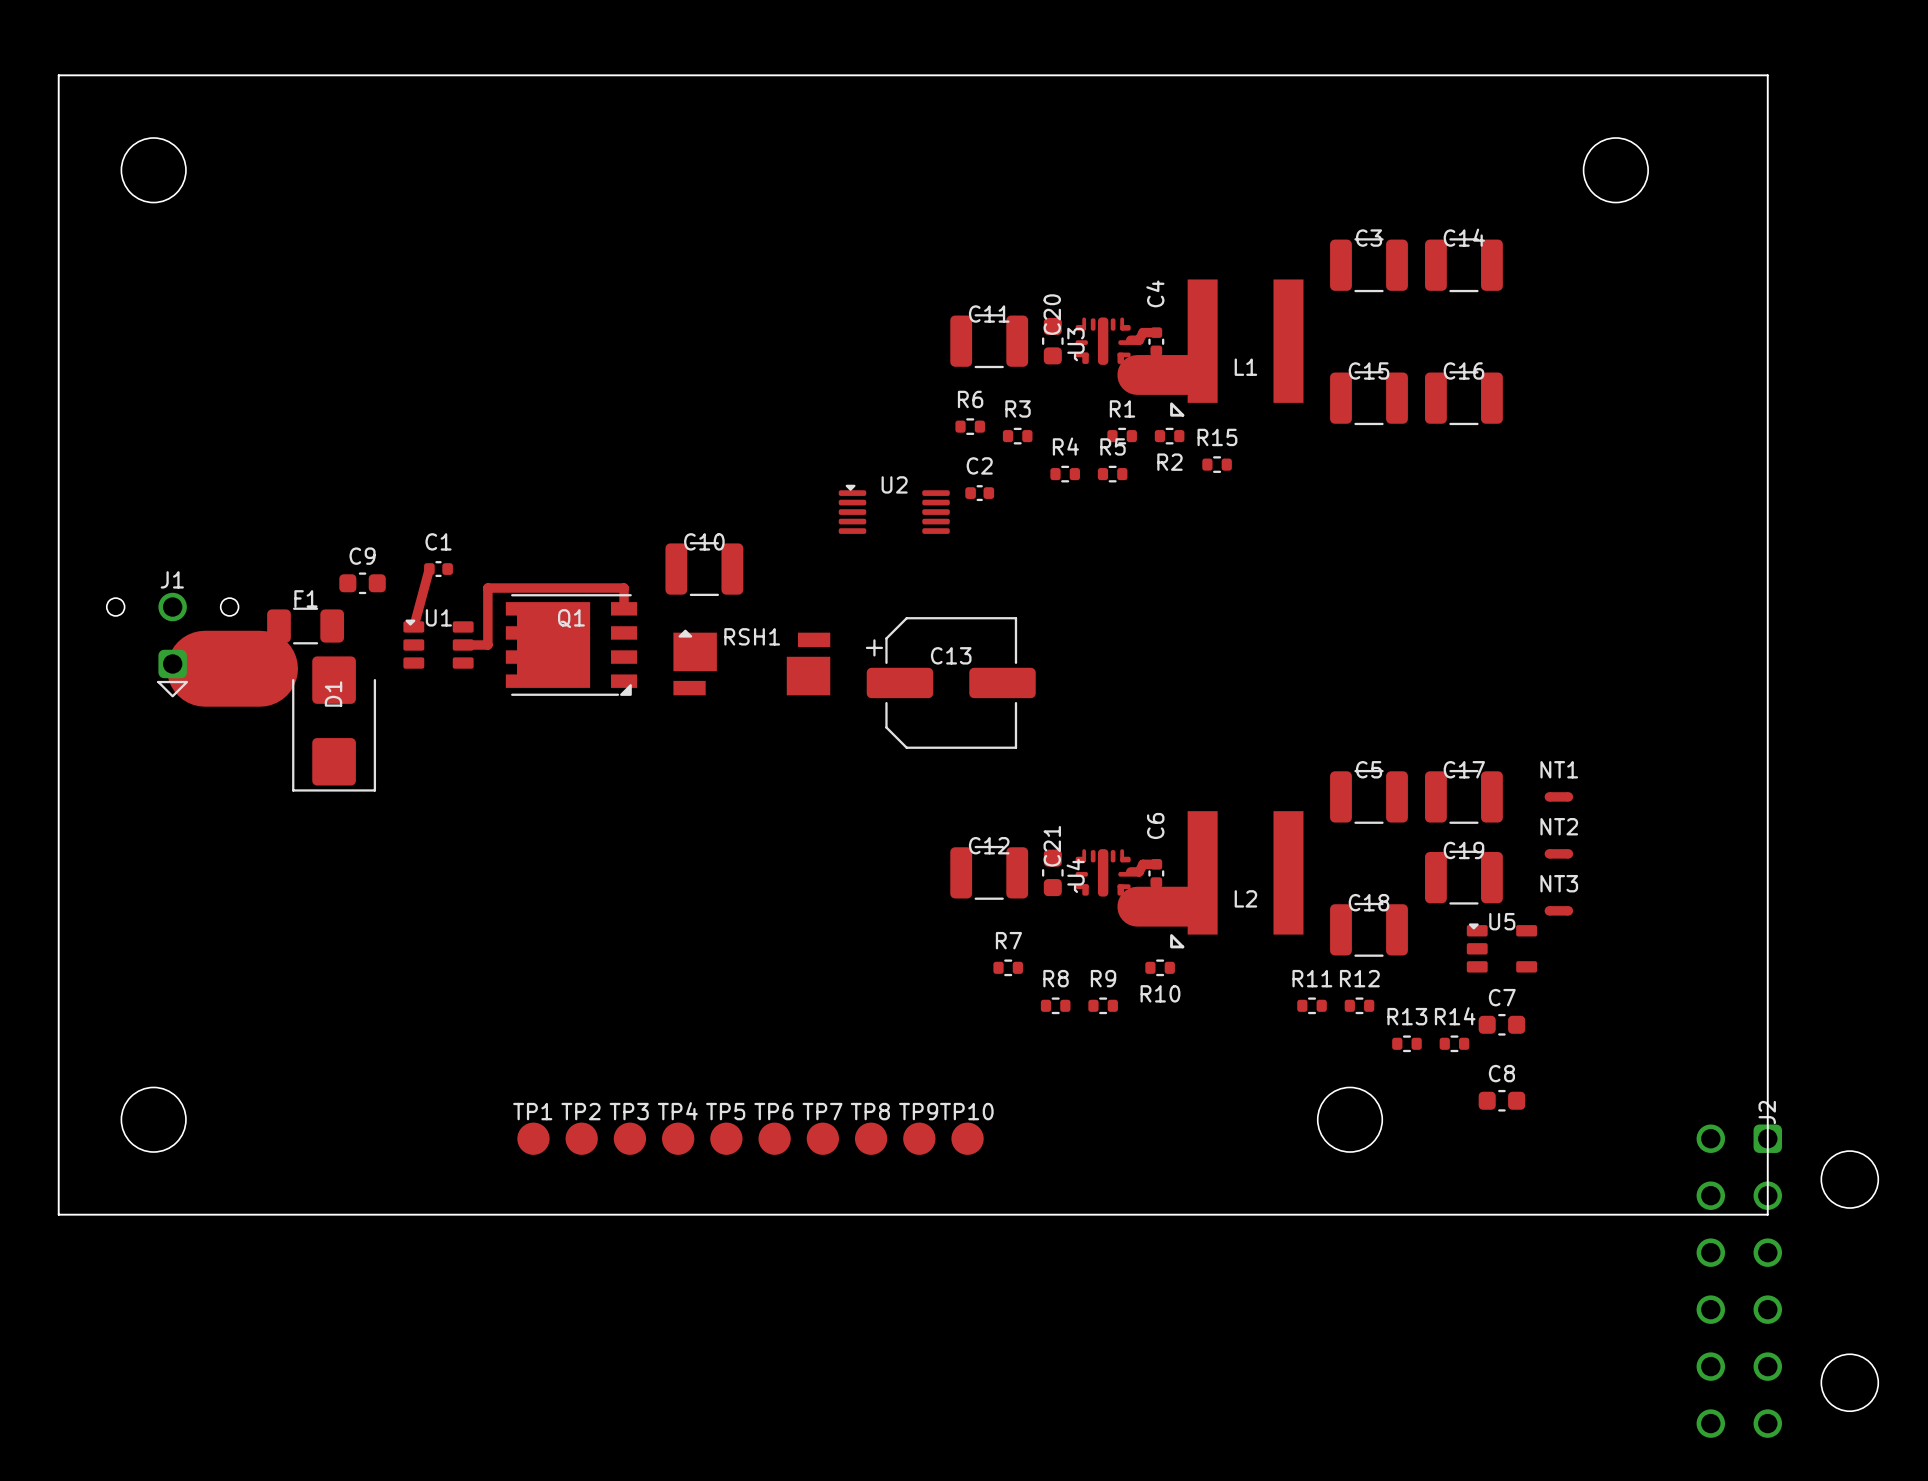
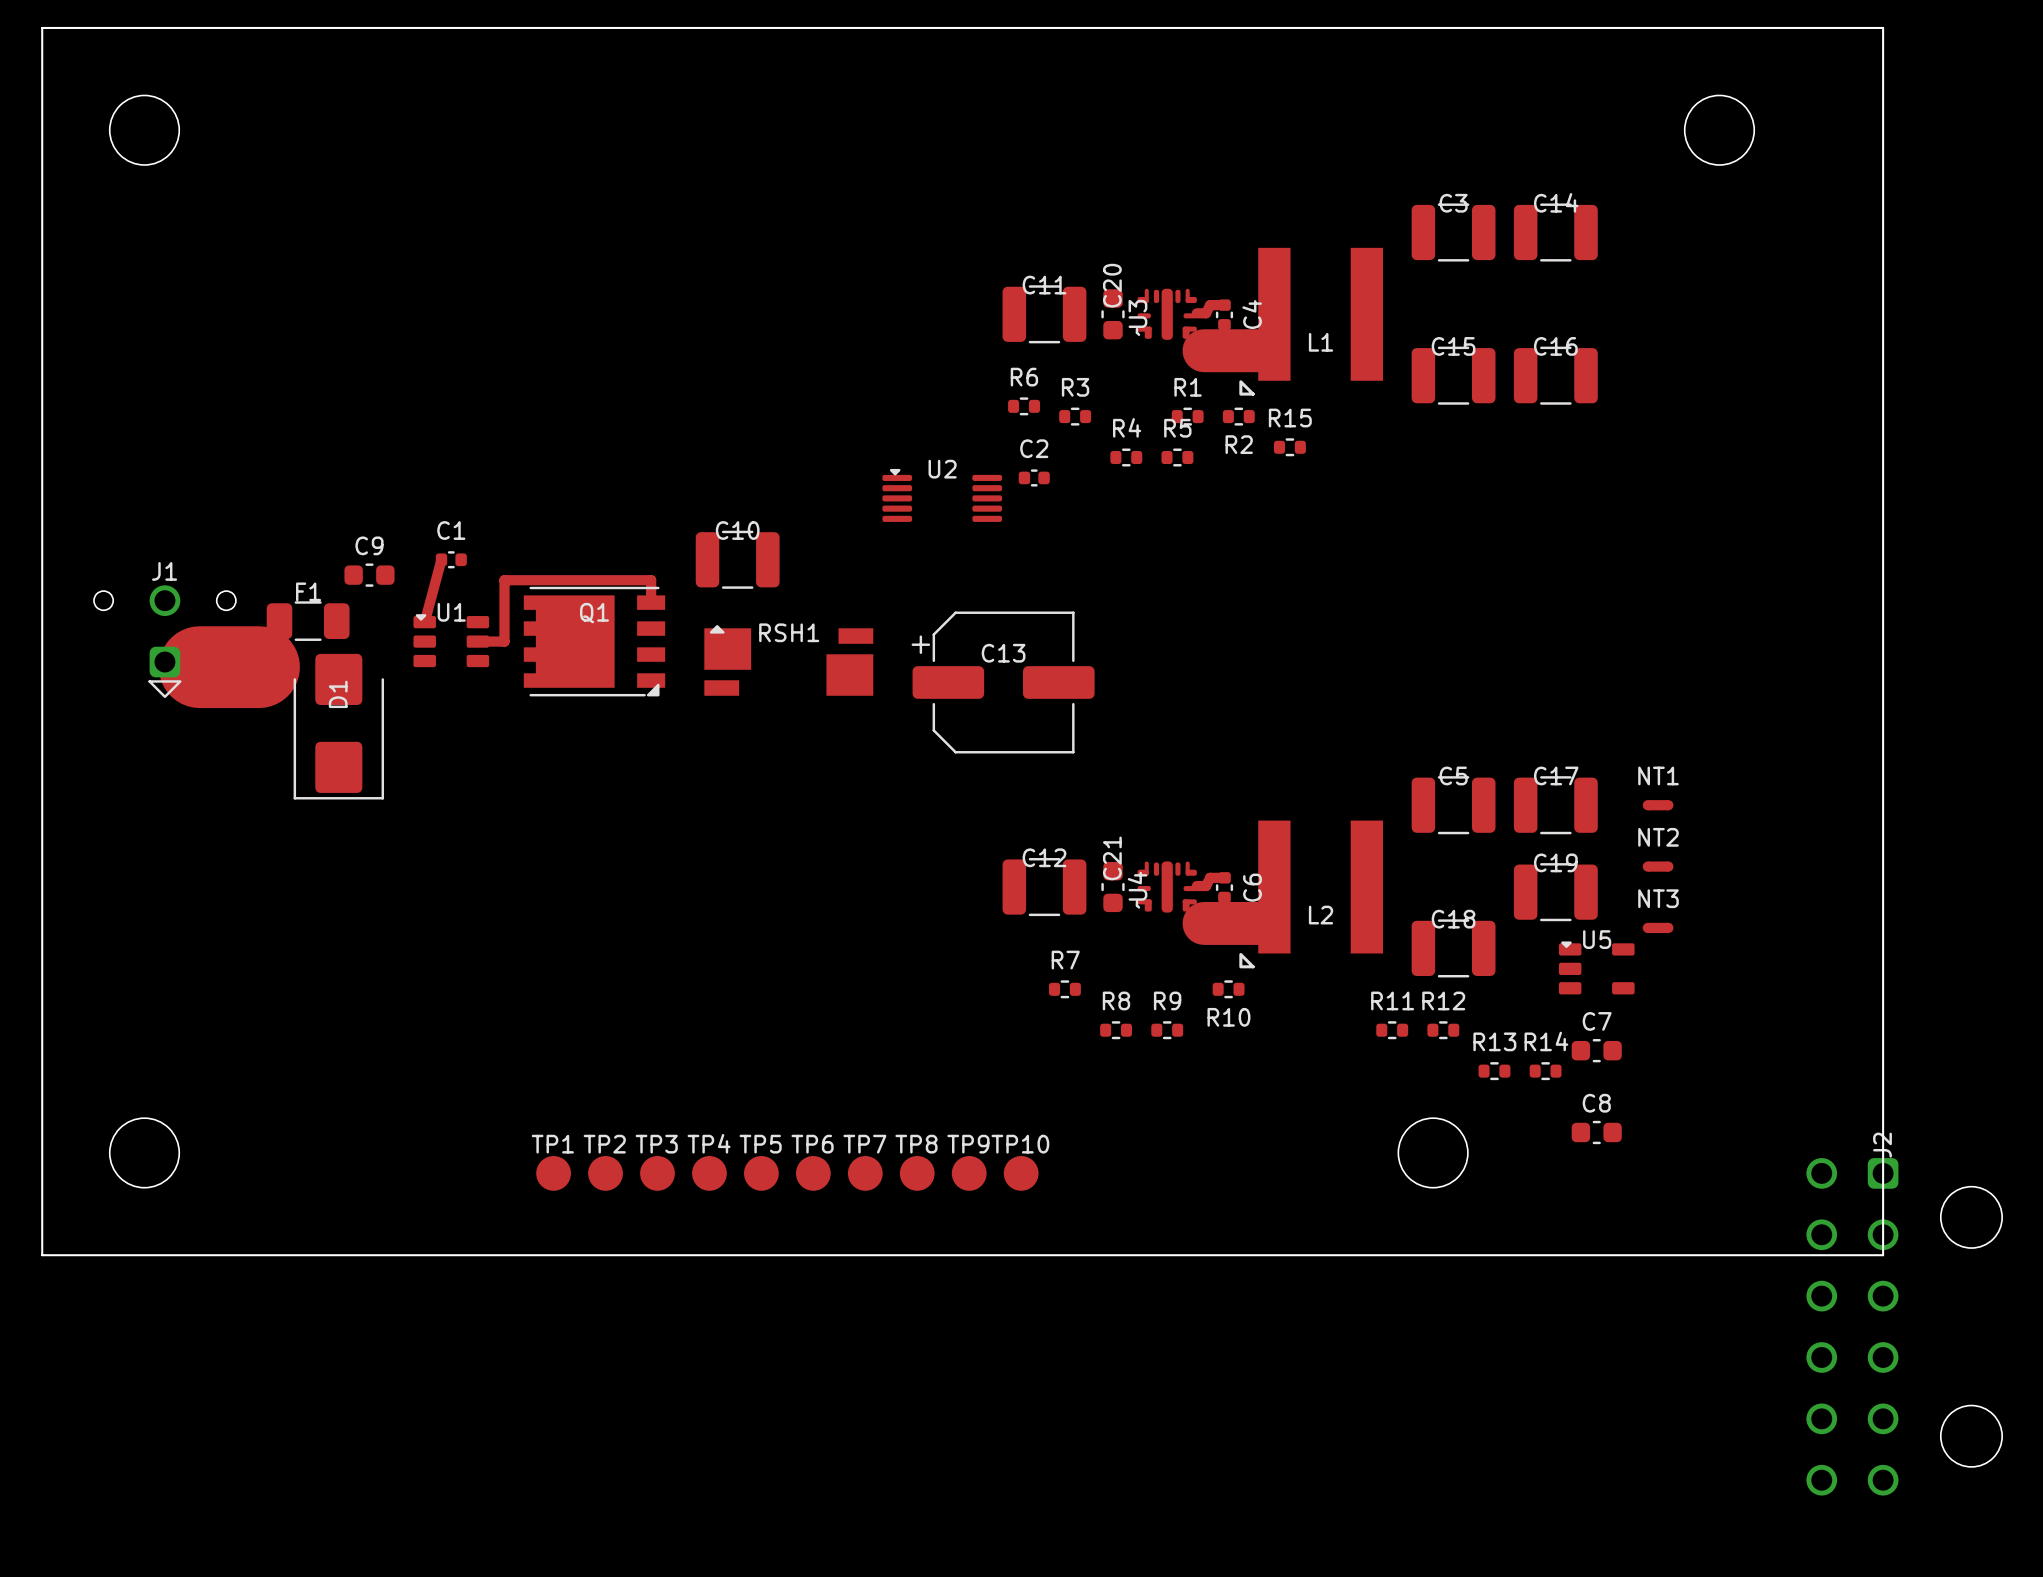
C4 name position: C4 (1155, 293) -> C4 (1252, 314)
C6 name position: C6 (1155, 825) -> C6 (1252, 887)

